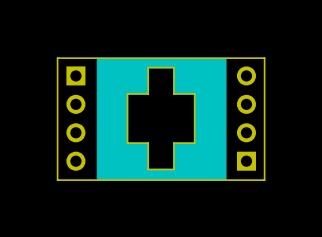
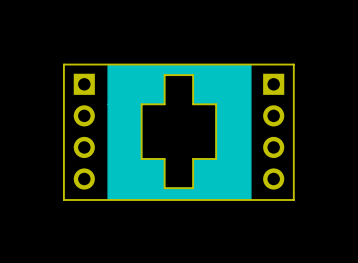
part rotation: 0° (246, 118) -> 180° (273, 131)

